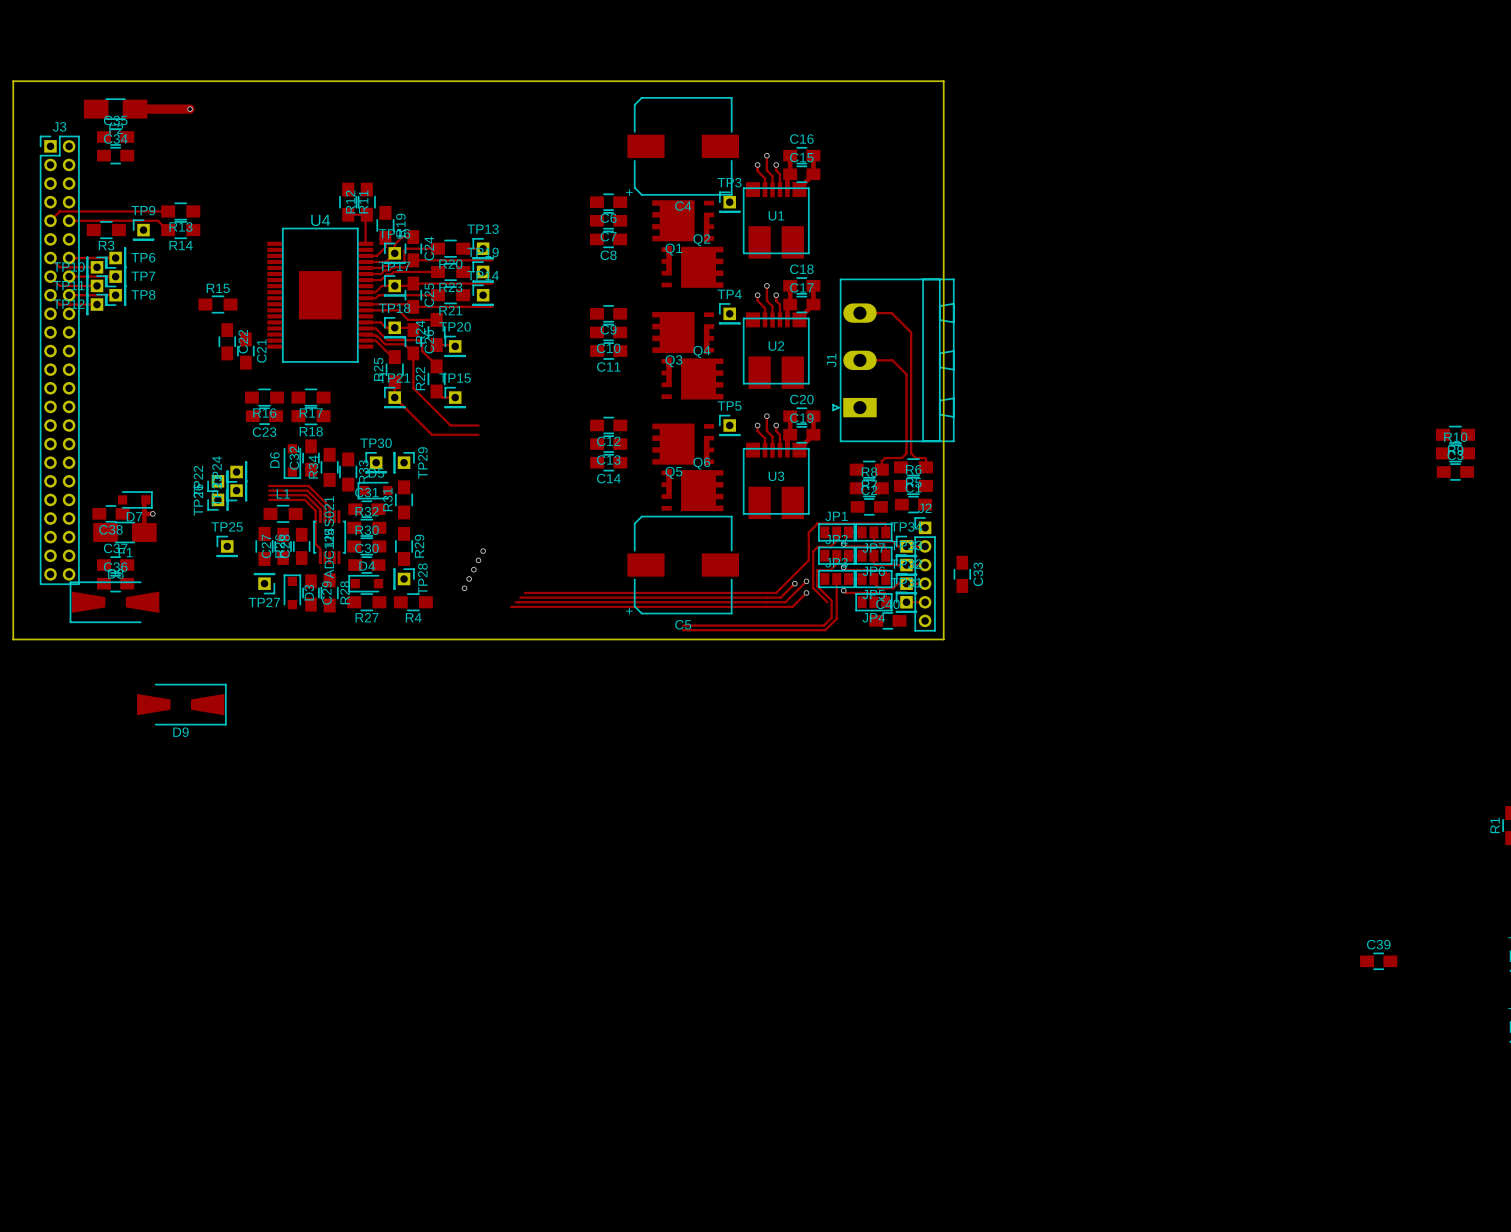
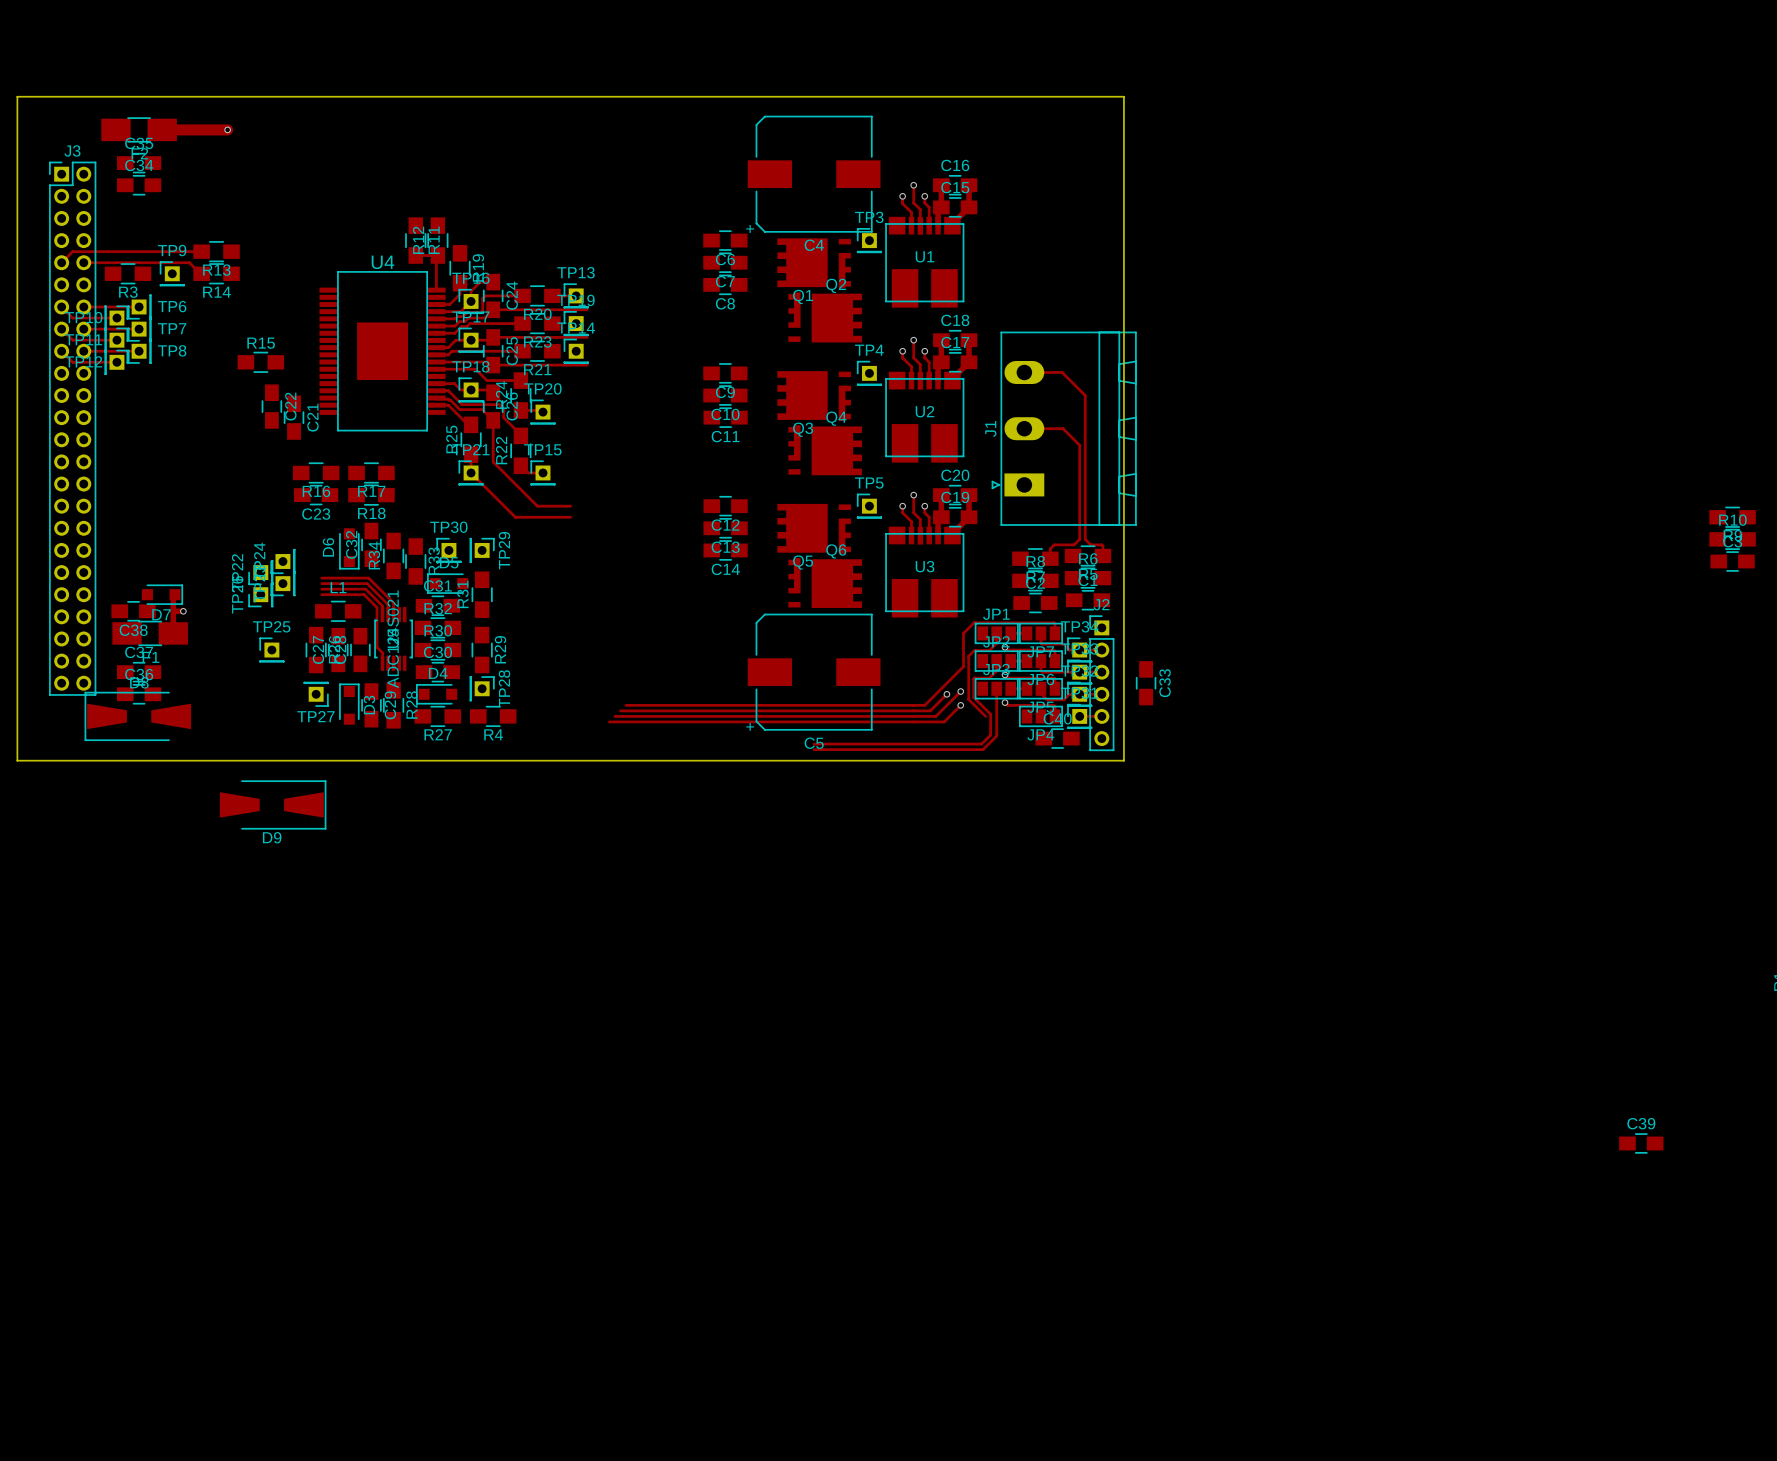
via: (483, 551) -> none
via: (478, 560) -> none
via: (473, 569) -> none
via: (469, 579) -> none
via: (464, 588) -> none
D9 position: (181, 704) -> (273, 804)

